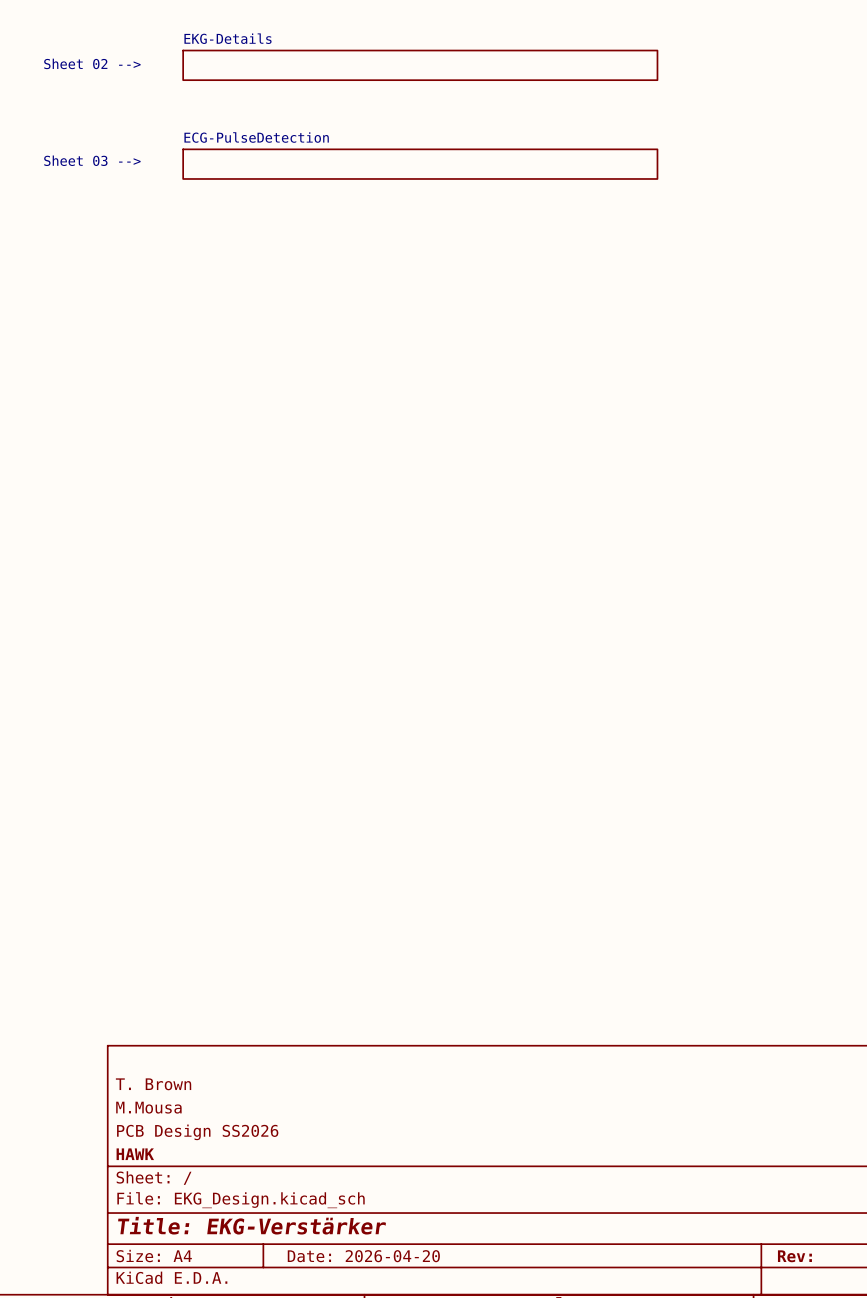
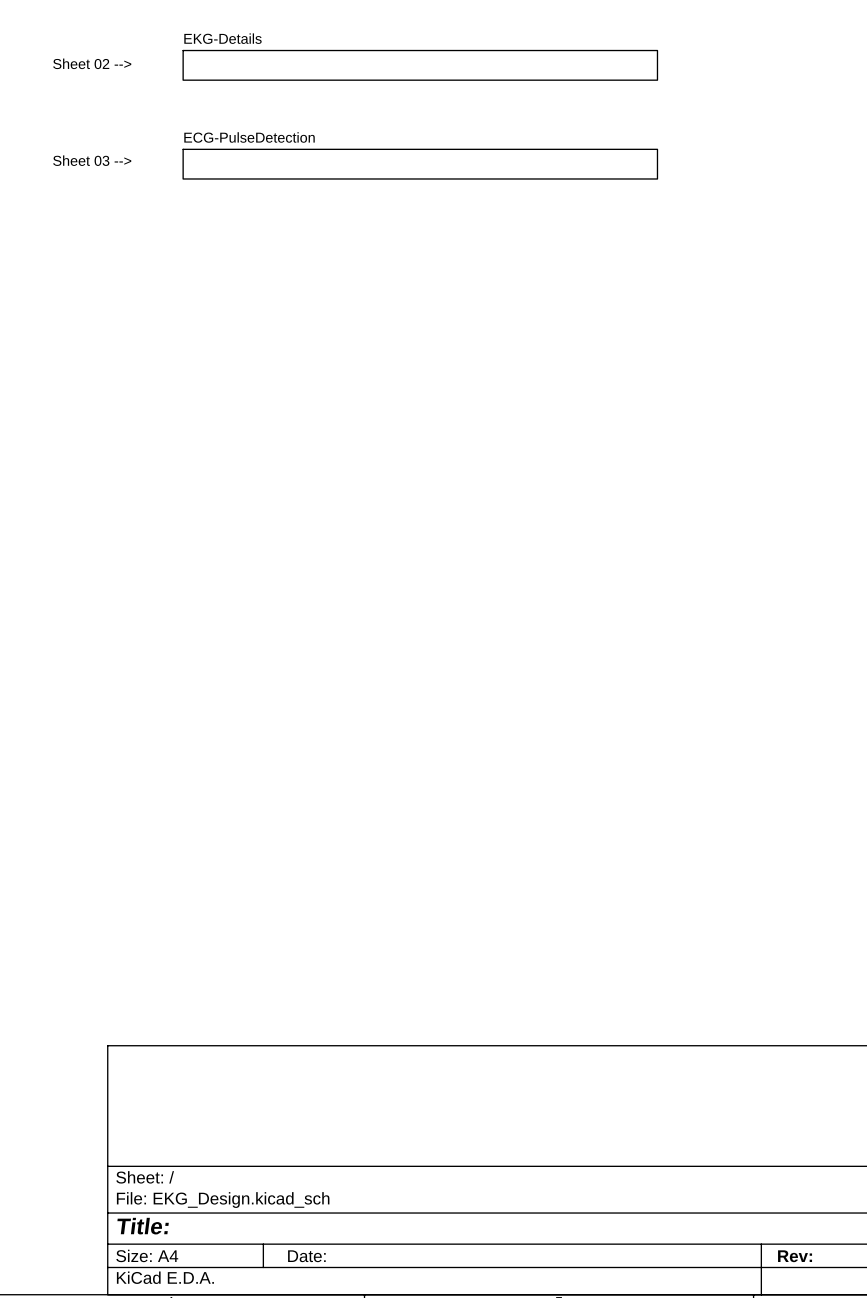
title block: T. Brown (153, 1084) -> none
title block: M.Mousa (148, 1107) -> none
title block: PCB Design SS2026 (197, 1132) -> none
title block: HAWK (135, 1154) -> none
title block: Title: EKG-Verstärker (252, 1225) -> Title: (143, 1226)
title block: Date: 2026-04-20 (363, 1256) -> Date: (306, 1256)

